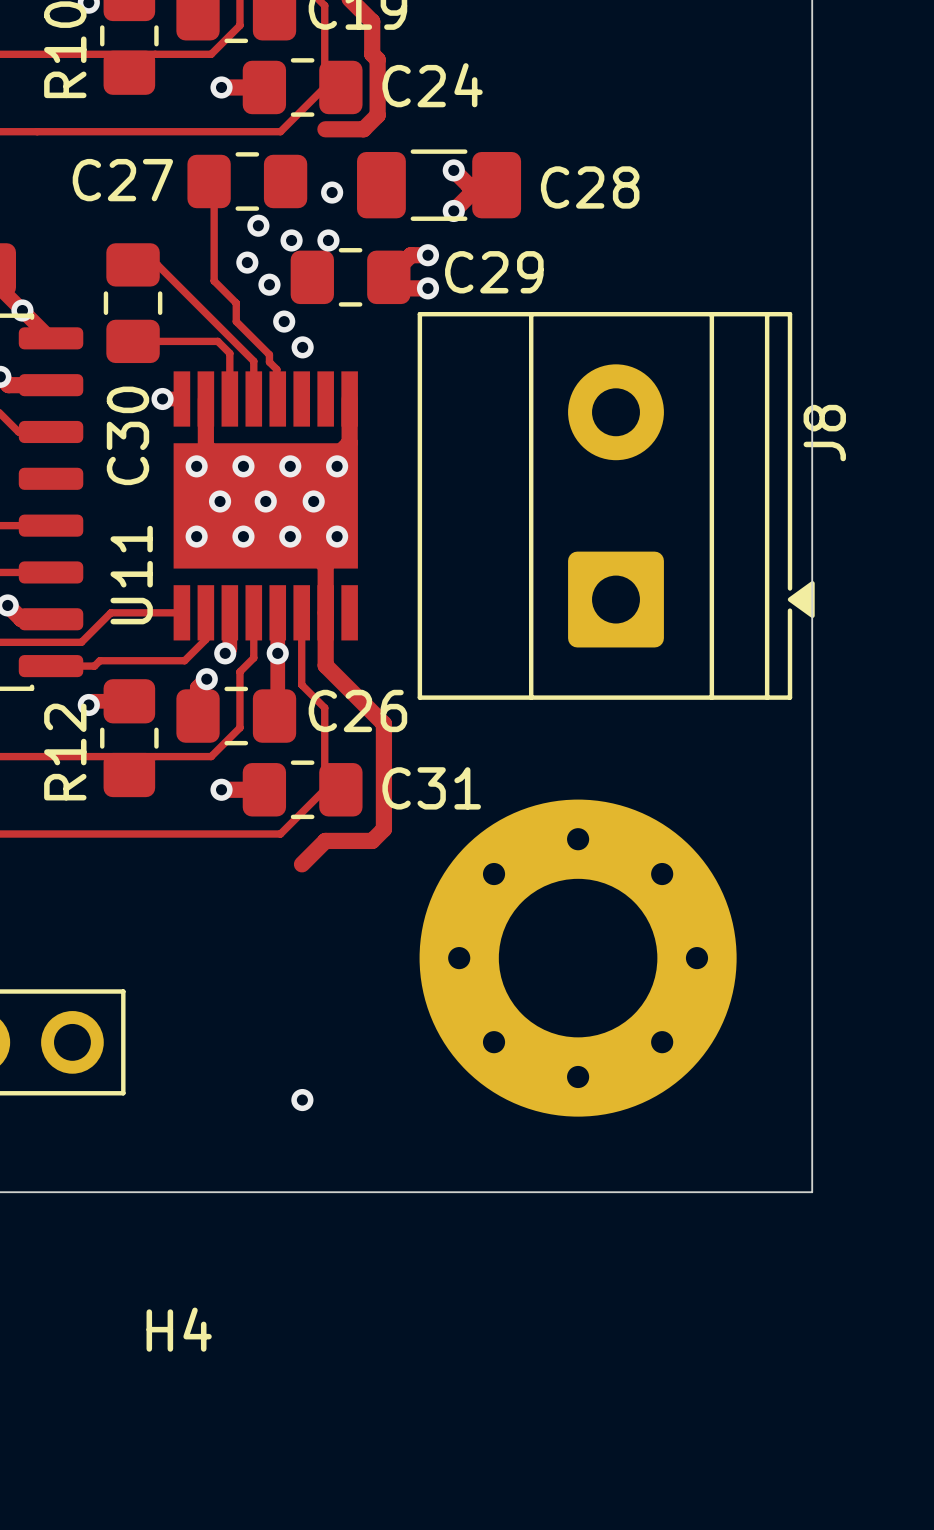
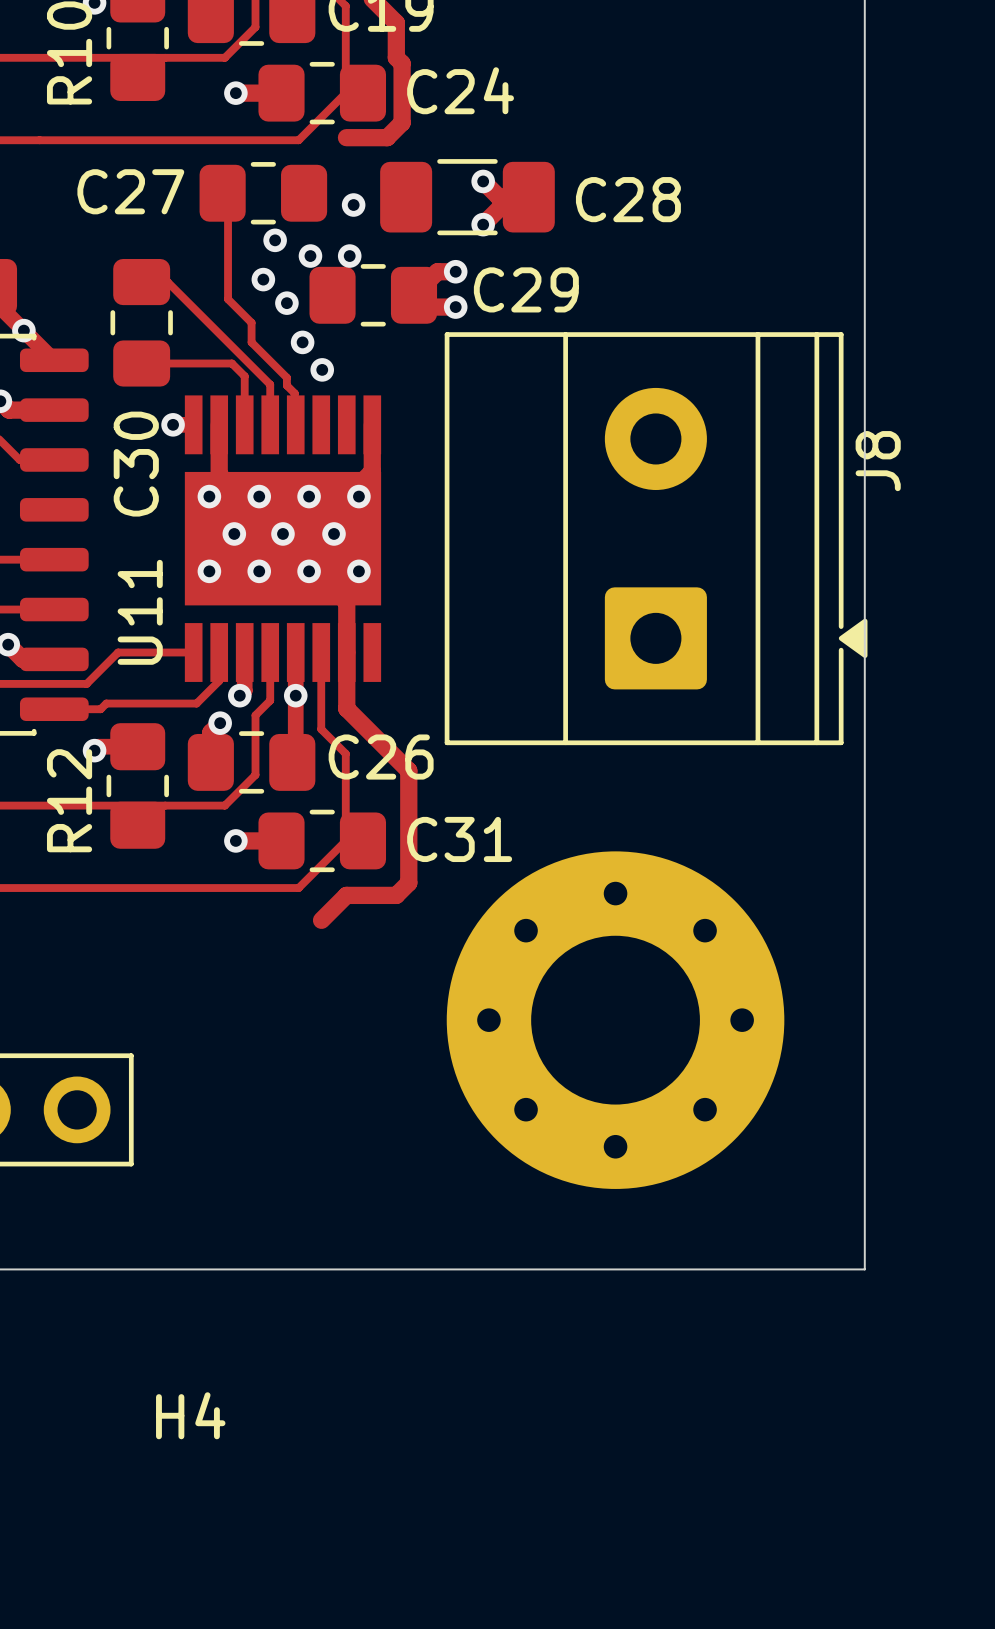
via: (302, 1100) -> none

